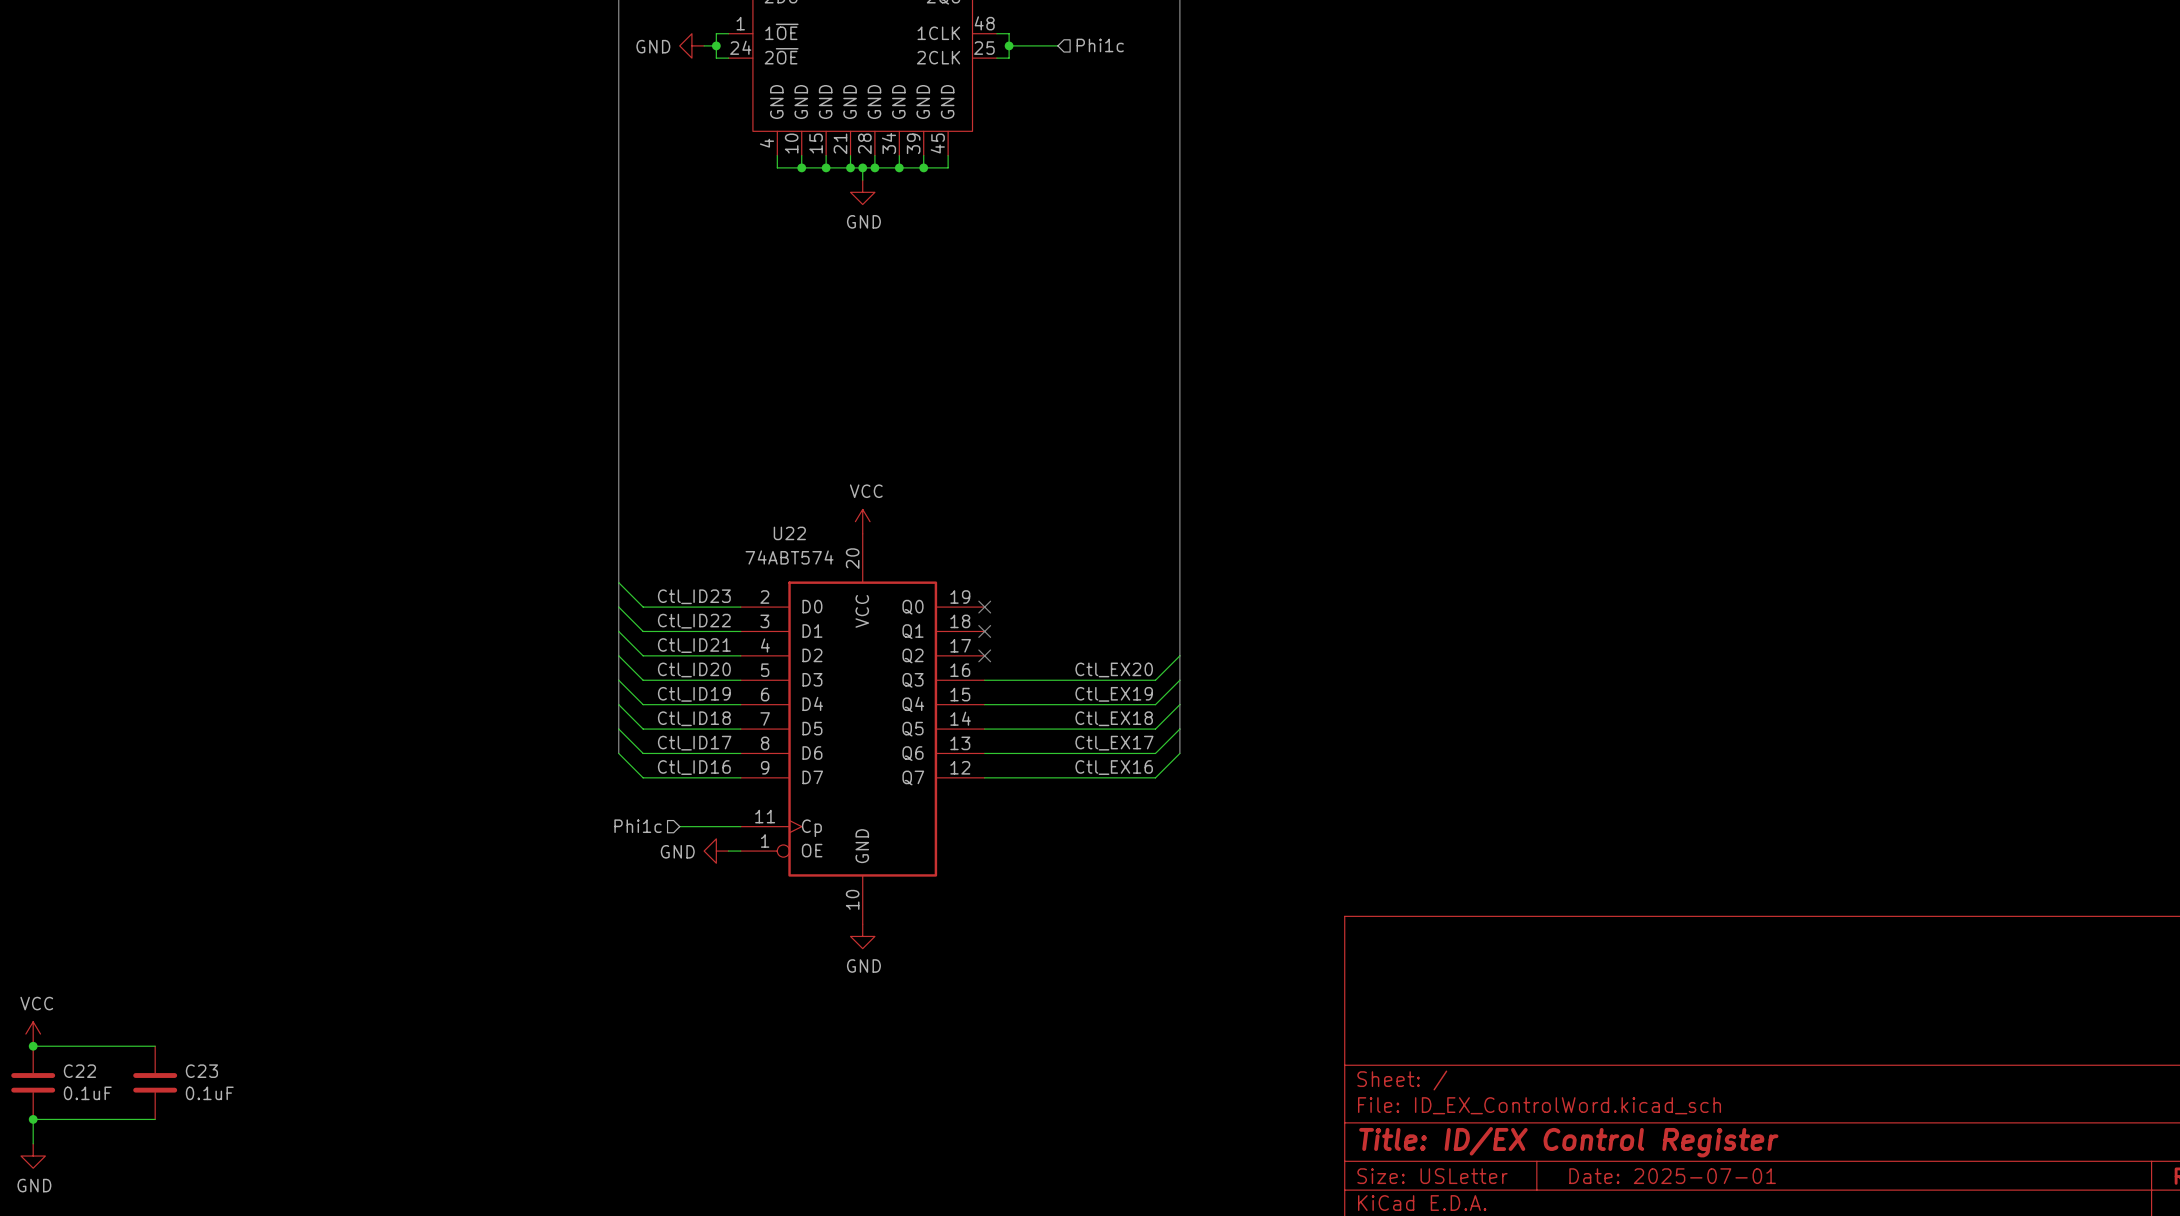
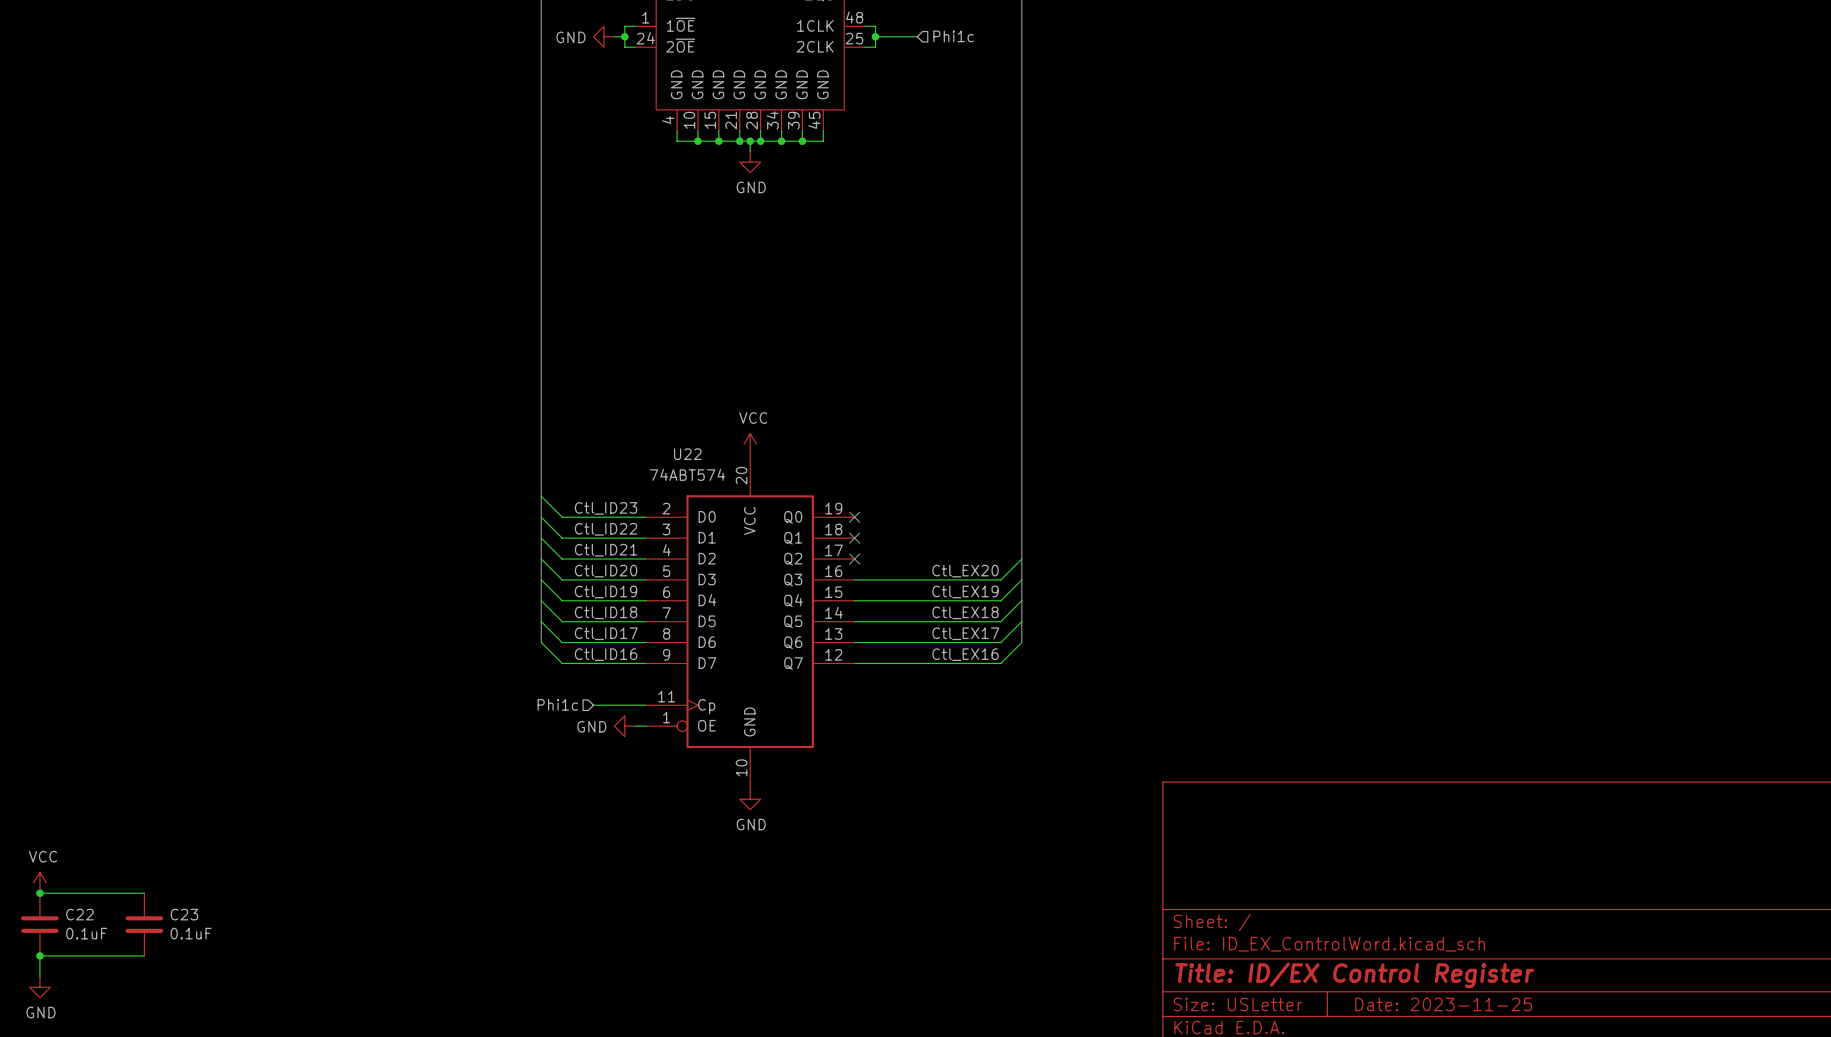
title block: Date: 2025-07-01 (1672, 1176) -> Date: 2023-11-25 (1443, 1004)

